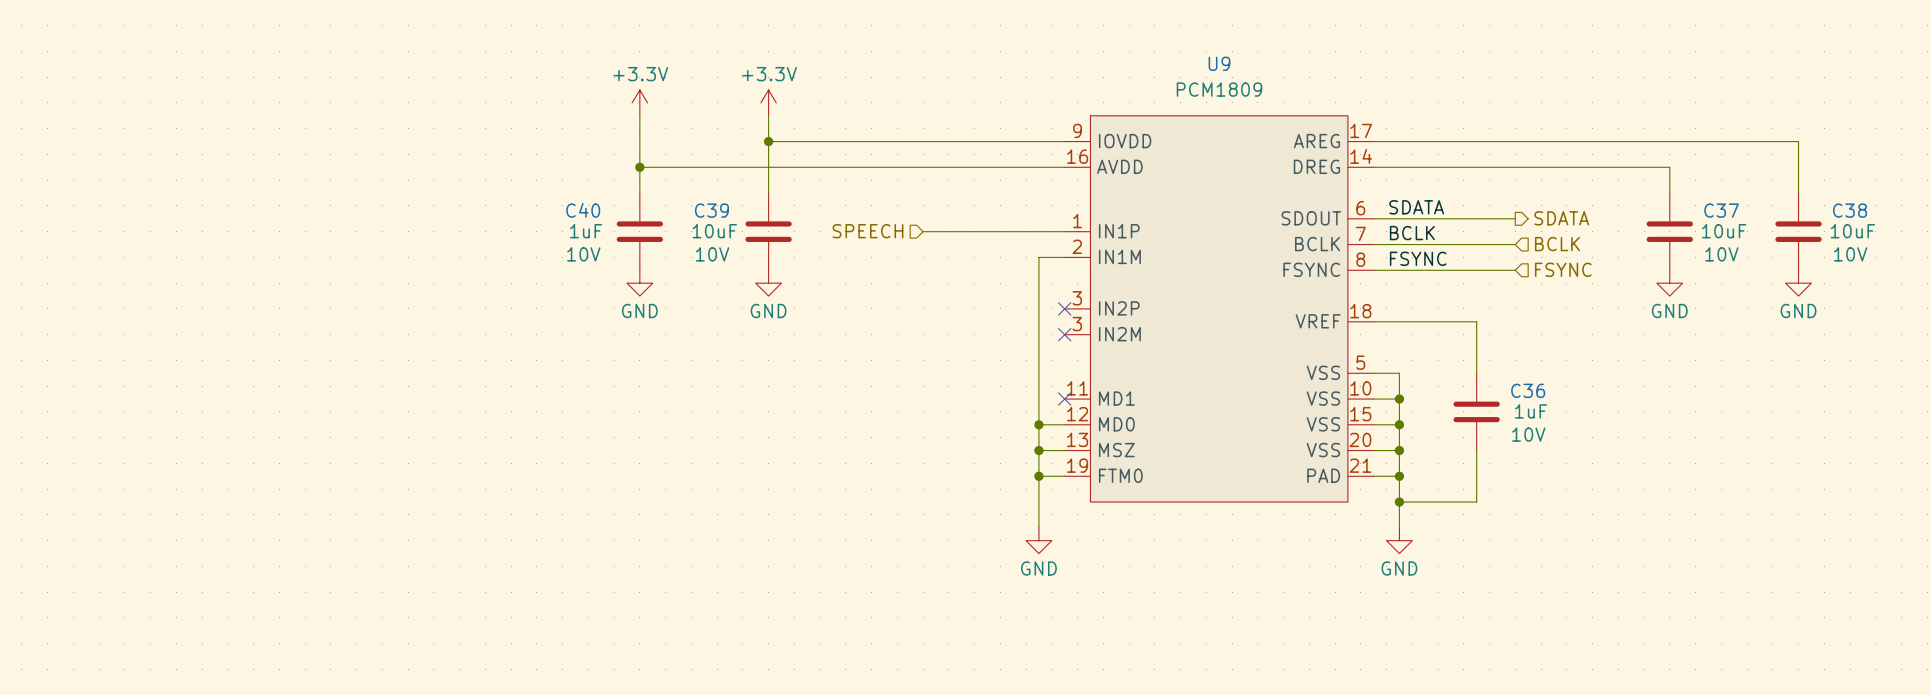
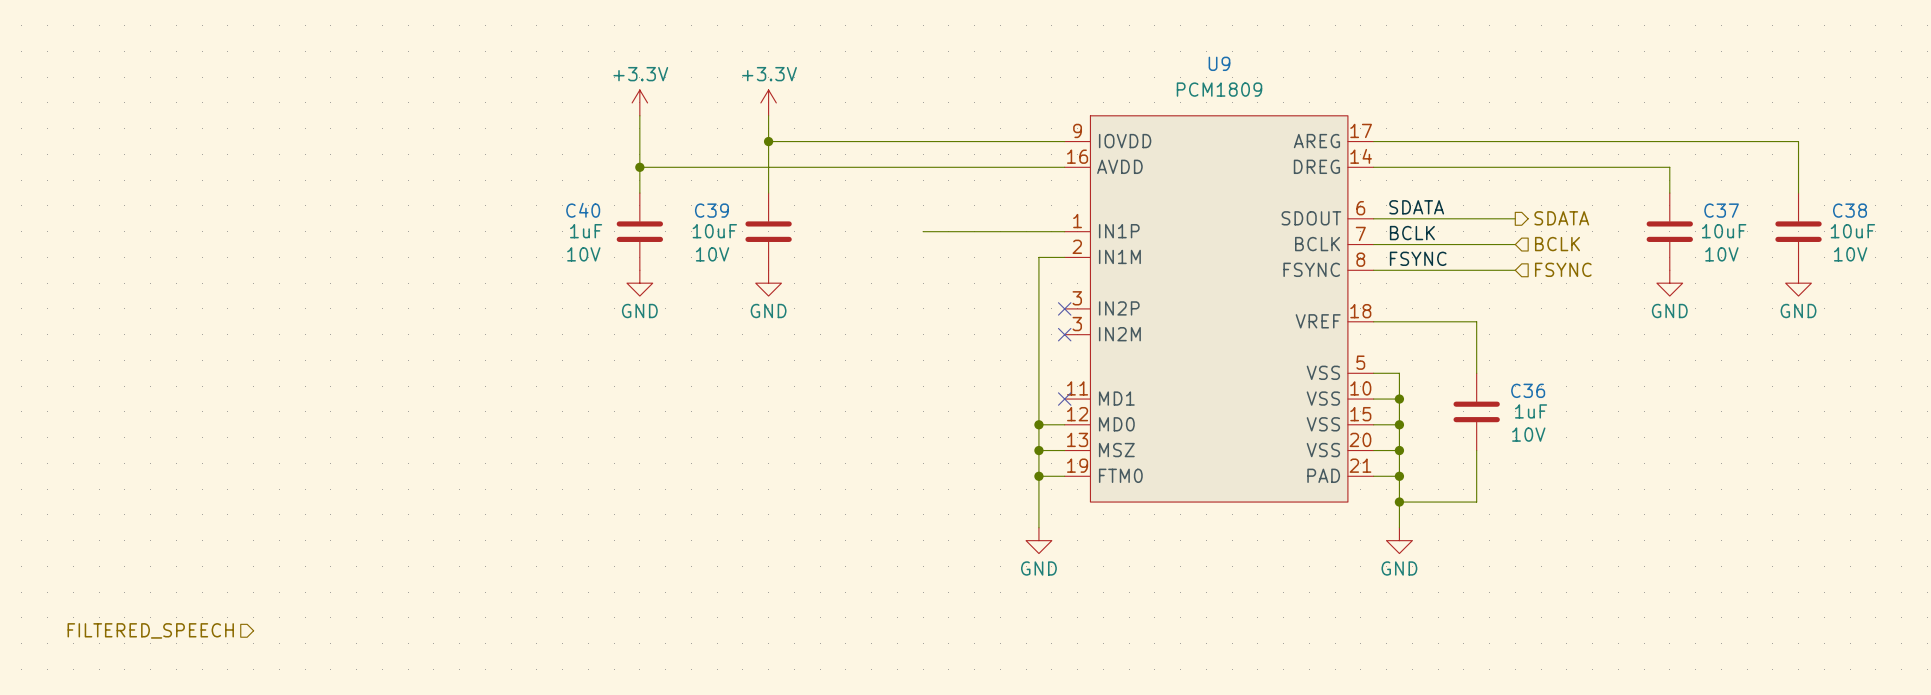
hierarchical label: SPEECH (868, 231) -> none
hierarchical label: none -> FILTERED_SPEECH (150, 630)

